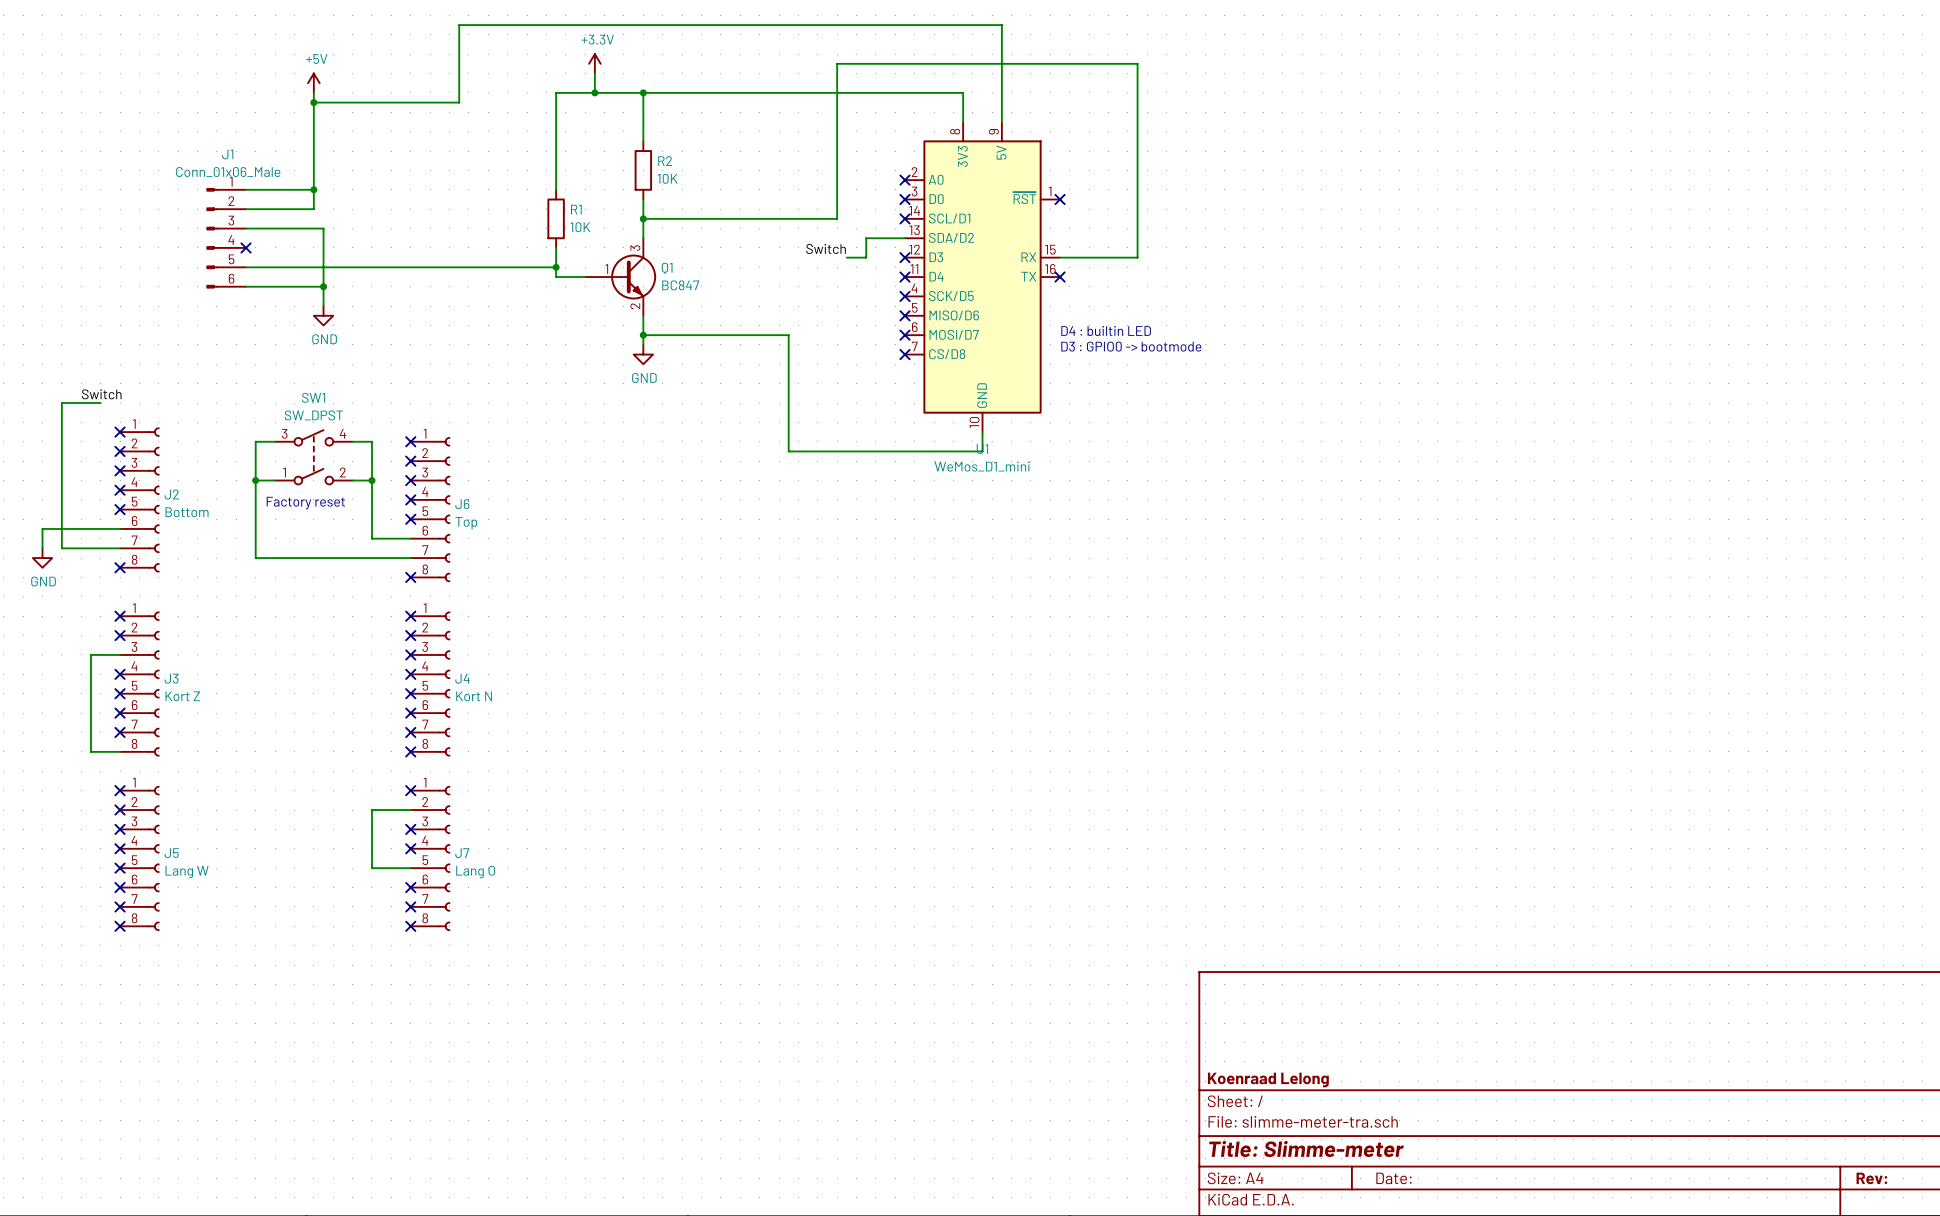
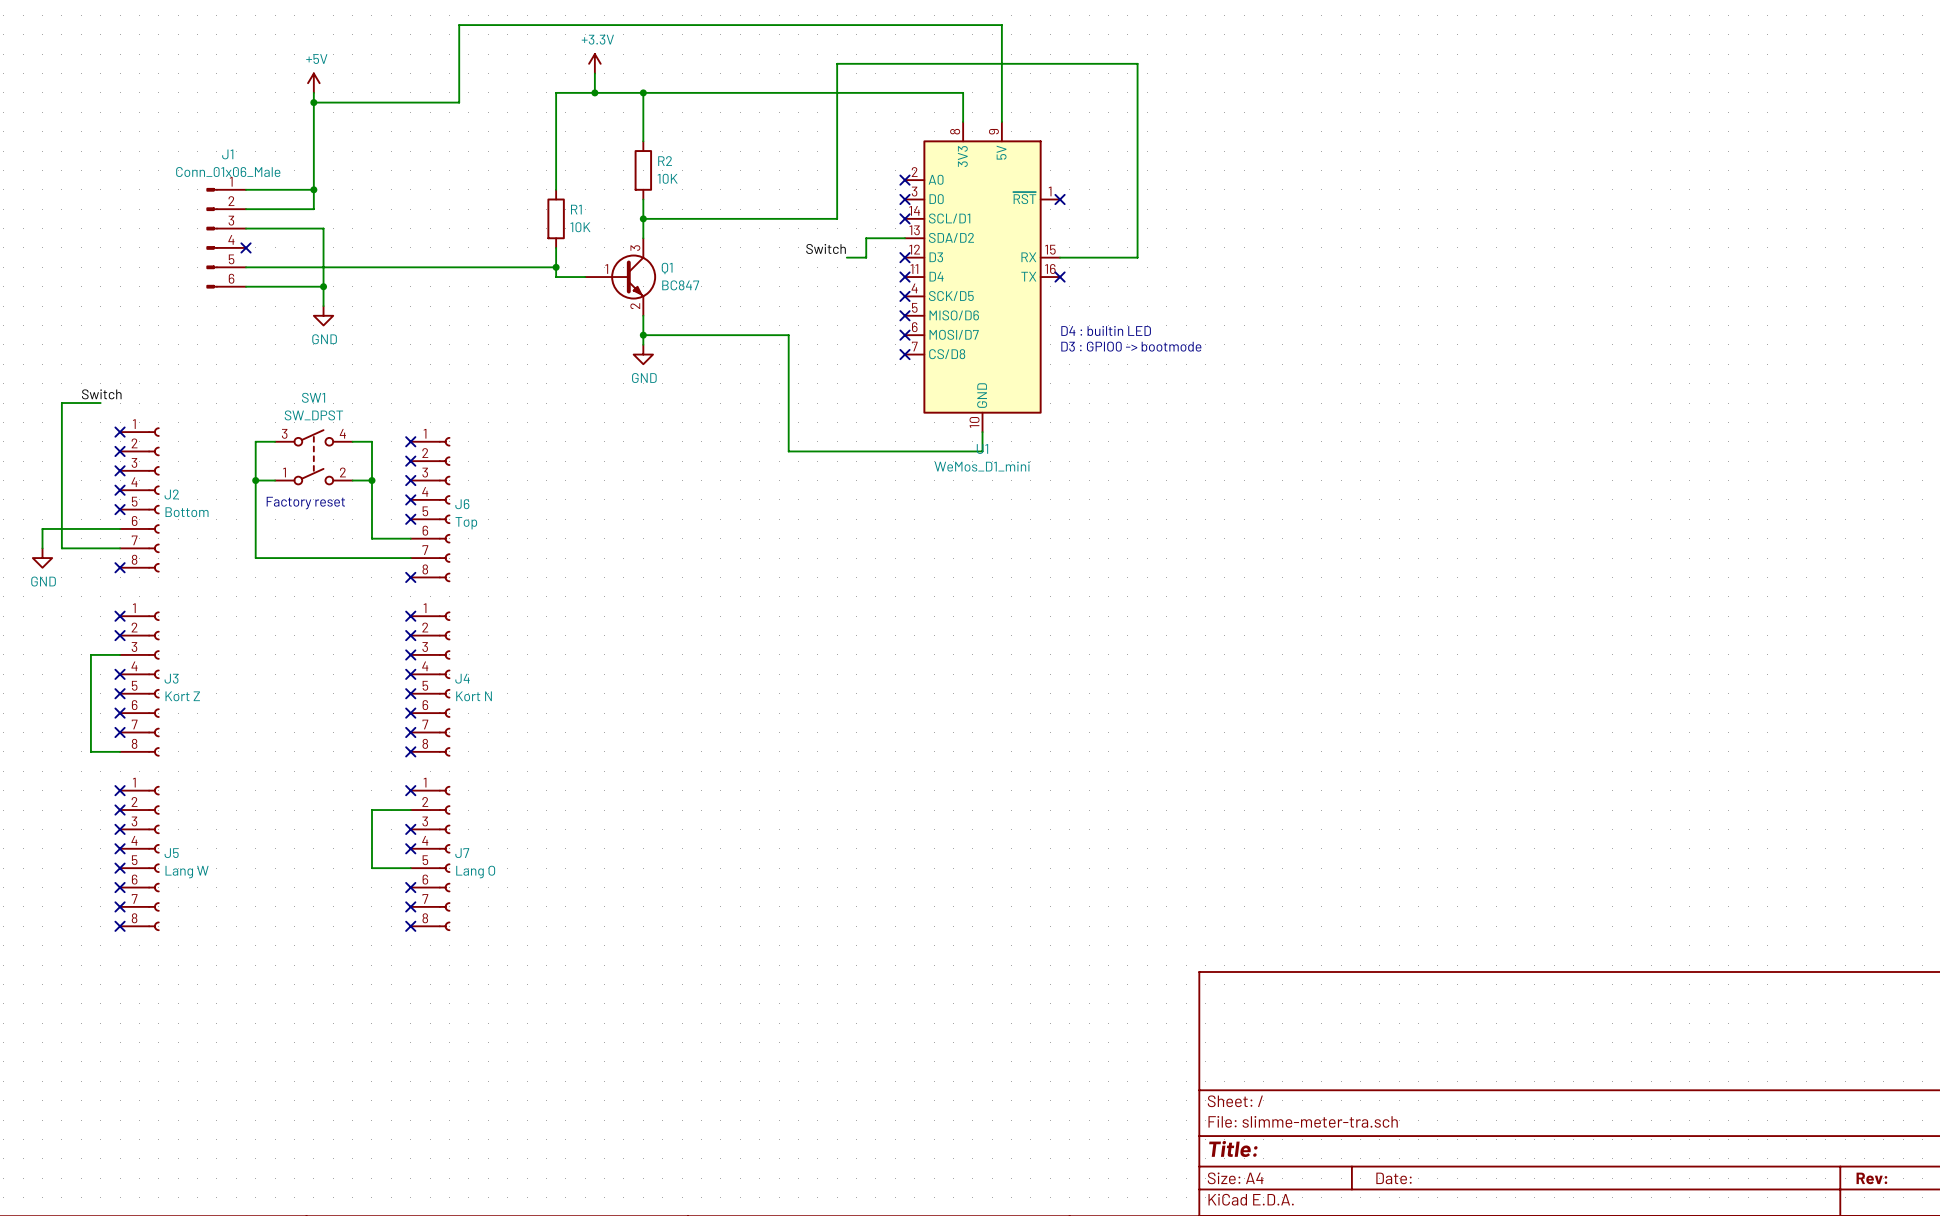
title block: Koenraad Lelong (1268, 1080) -> none
title block: Title: Slimme-meter (1306, 1148) -> Title: (1233, 1148)

